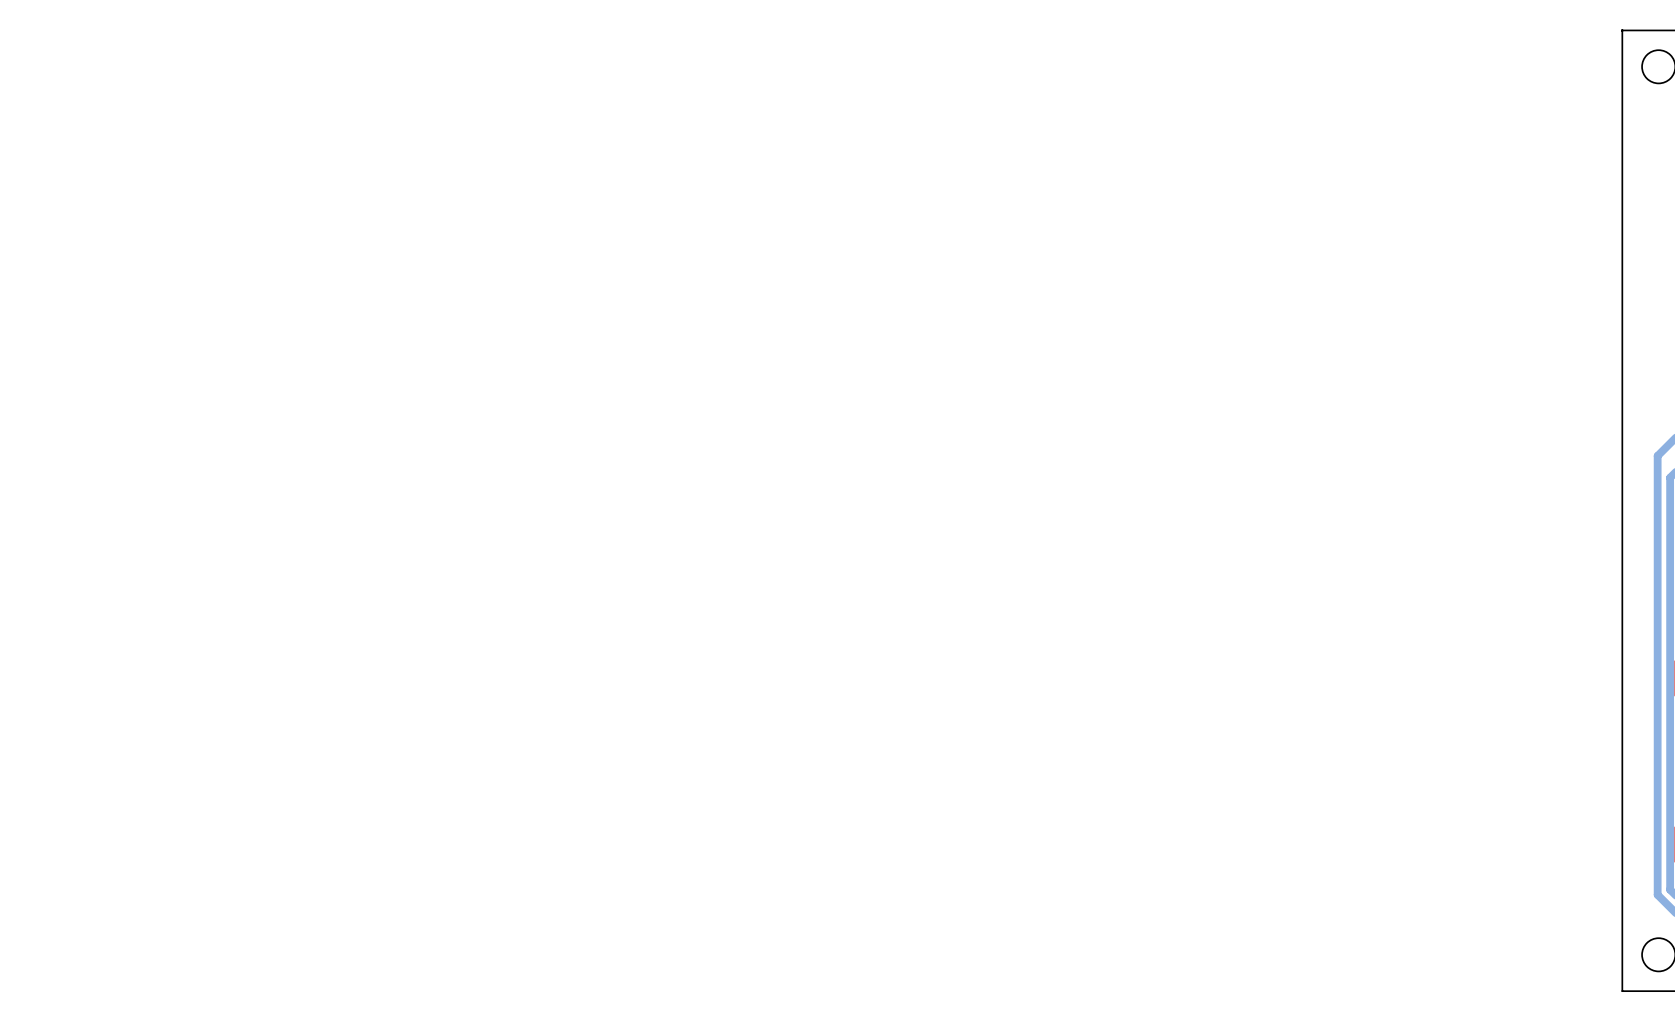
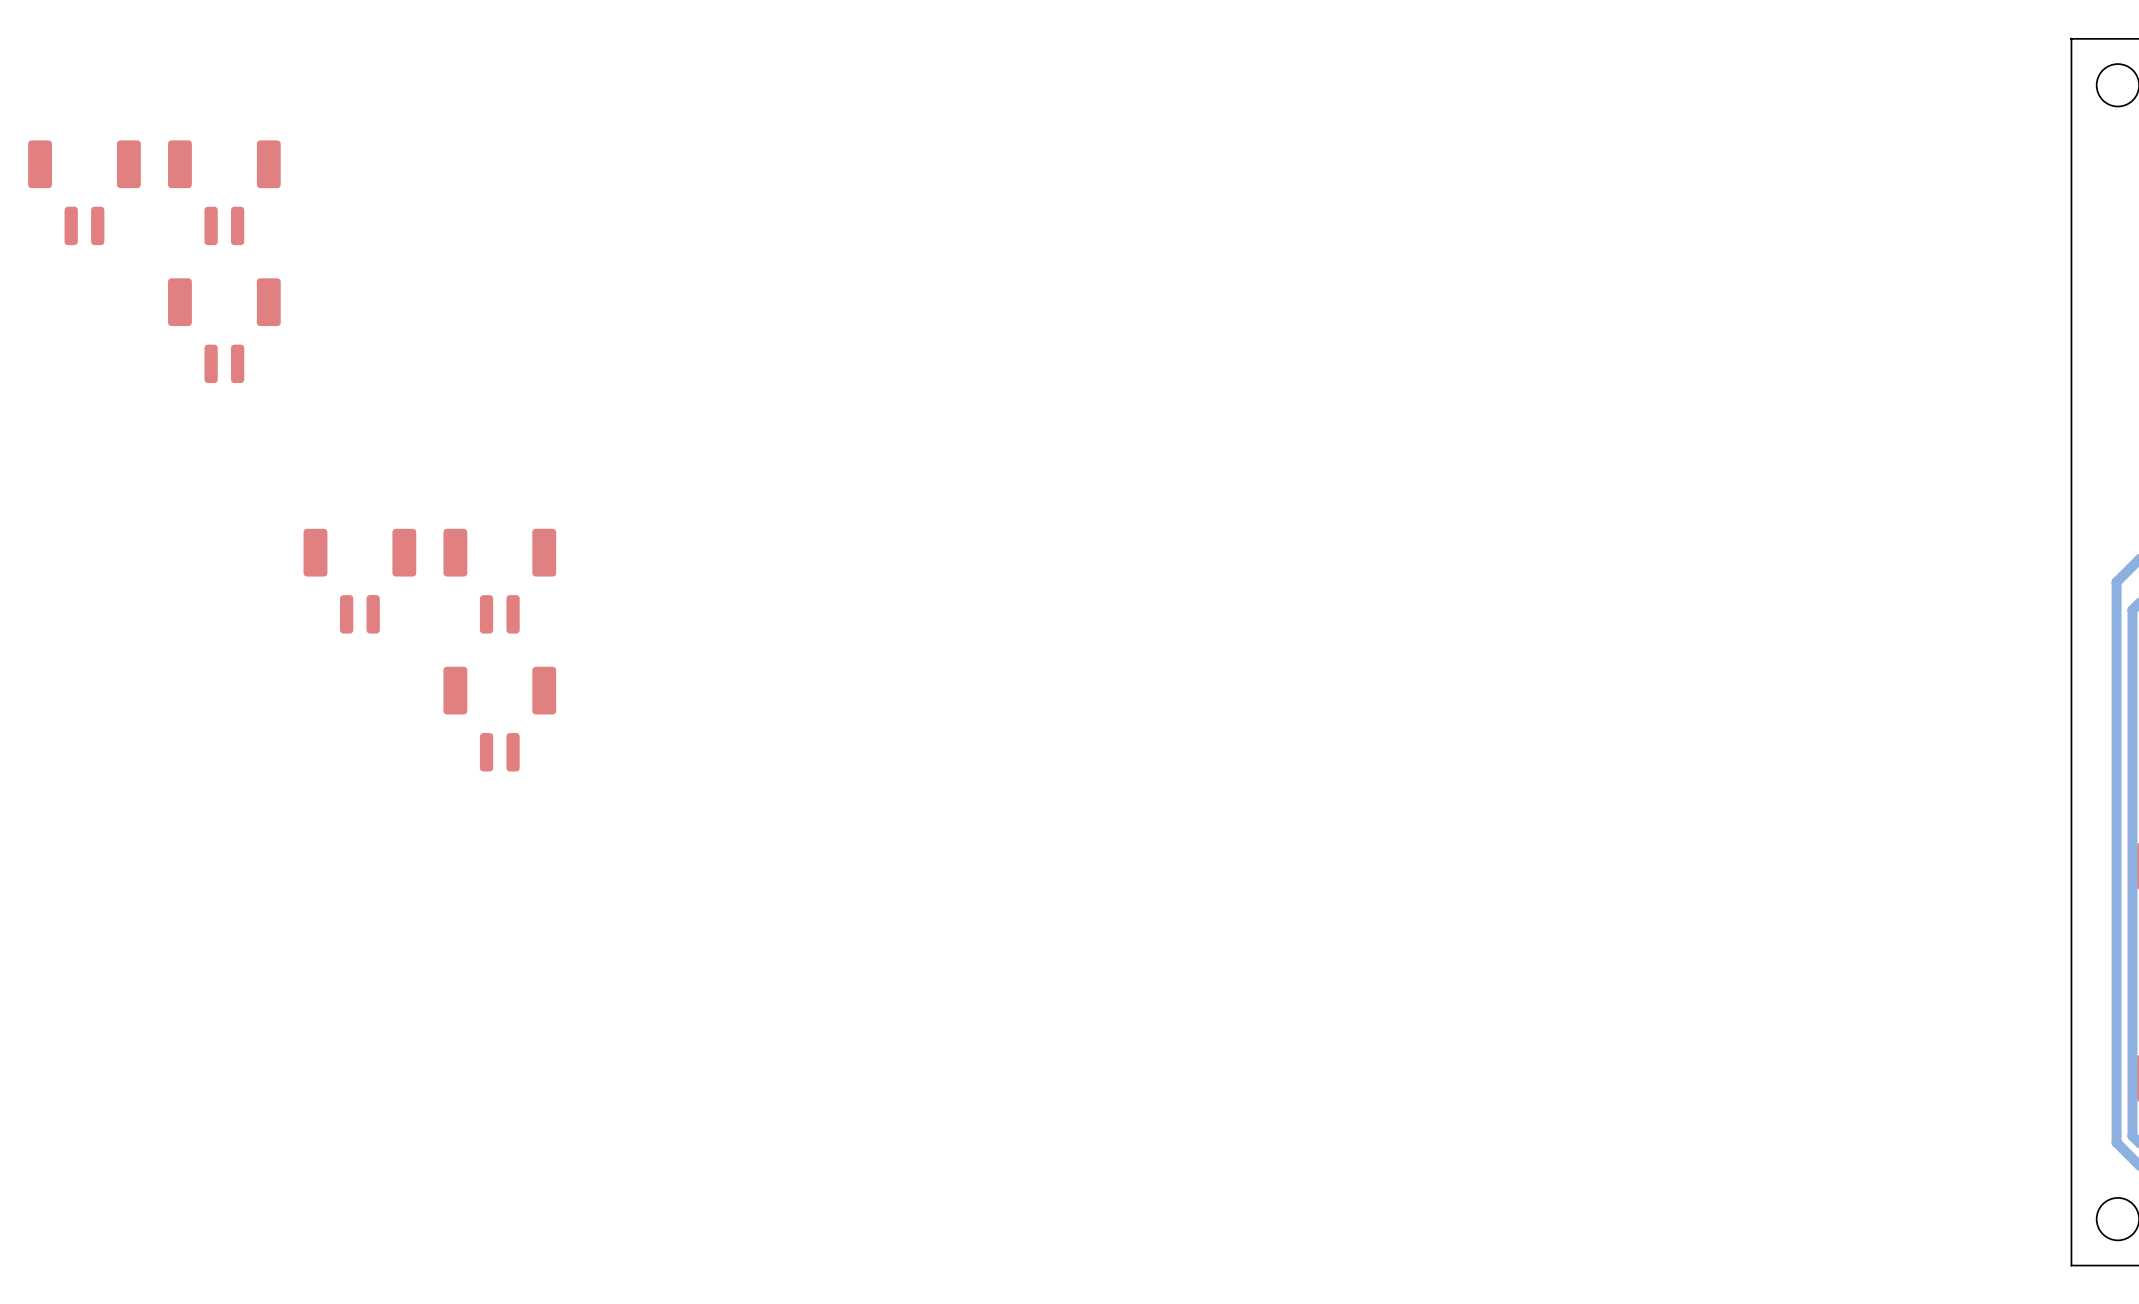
part: none -> (84, 192)
part: none -> (224, 192)
part: none -> (224, 330)
part: none -> (359, 581)
part: none -> (499, 581)
part: none -> (499, 719)

